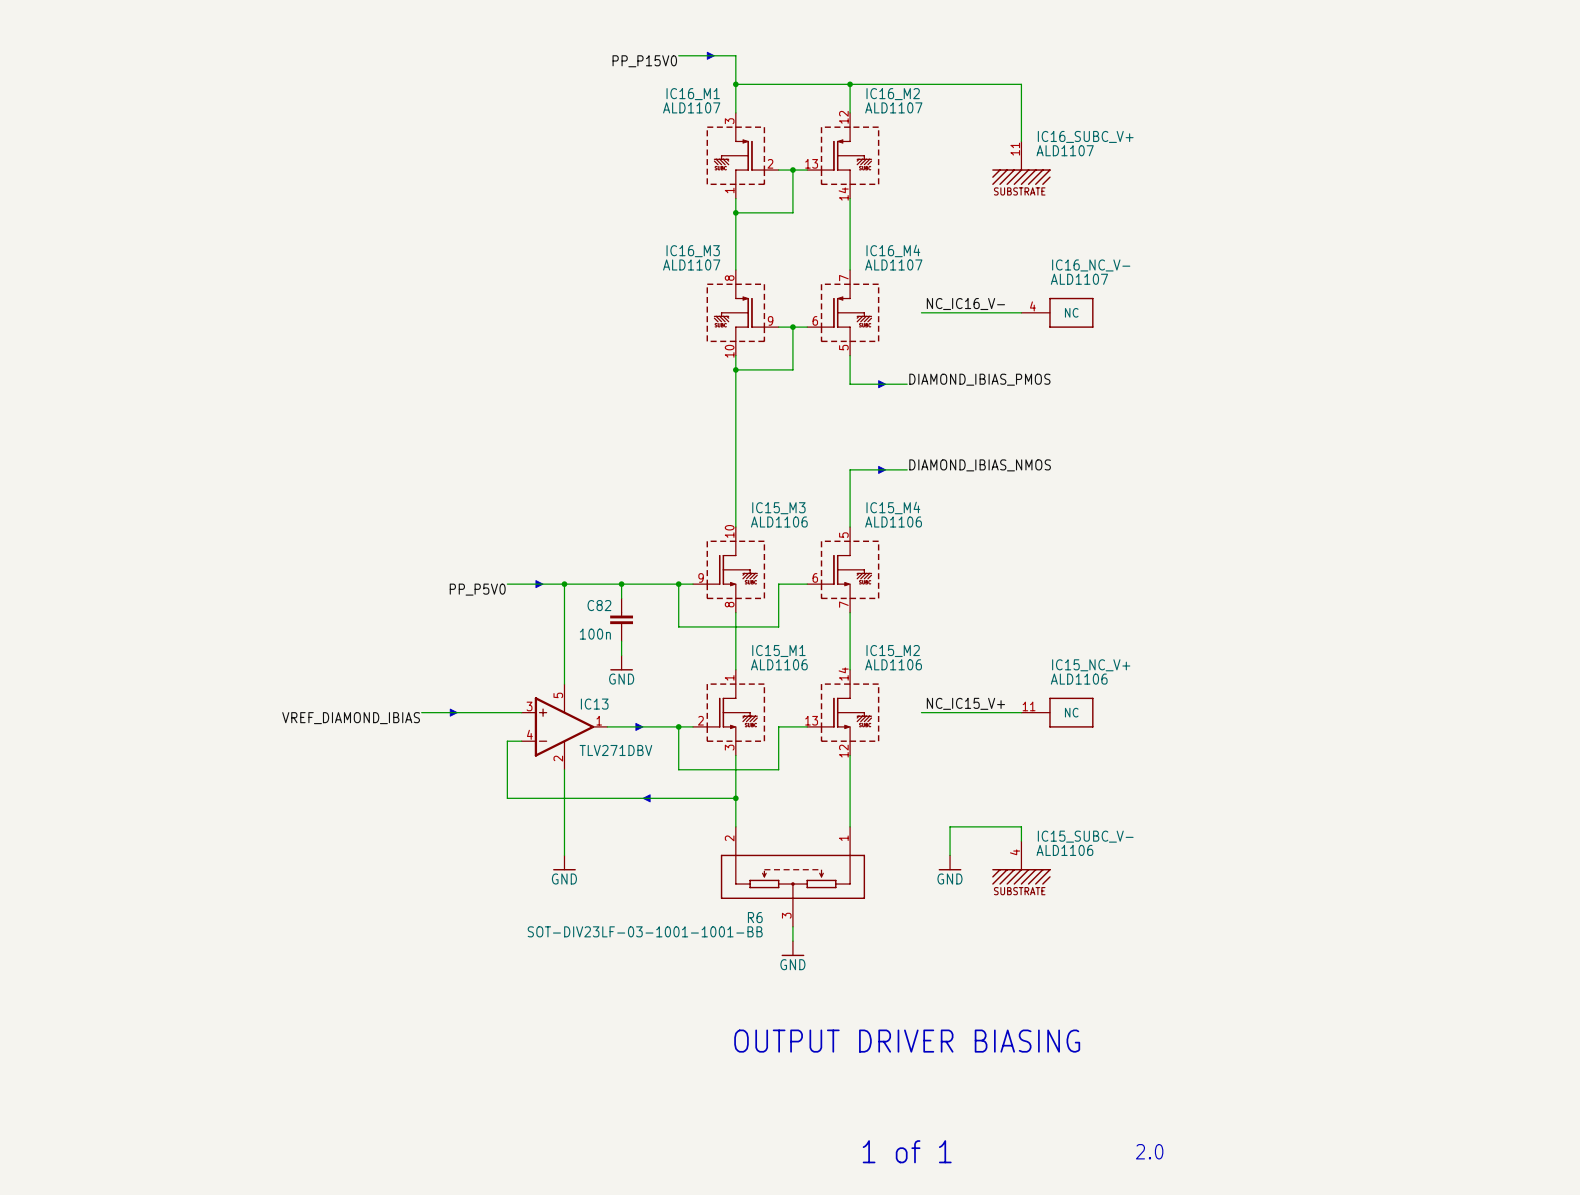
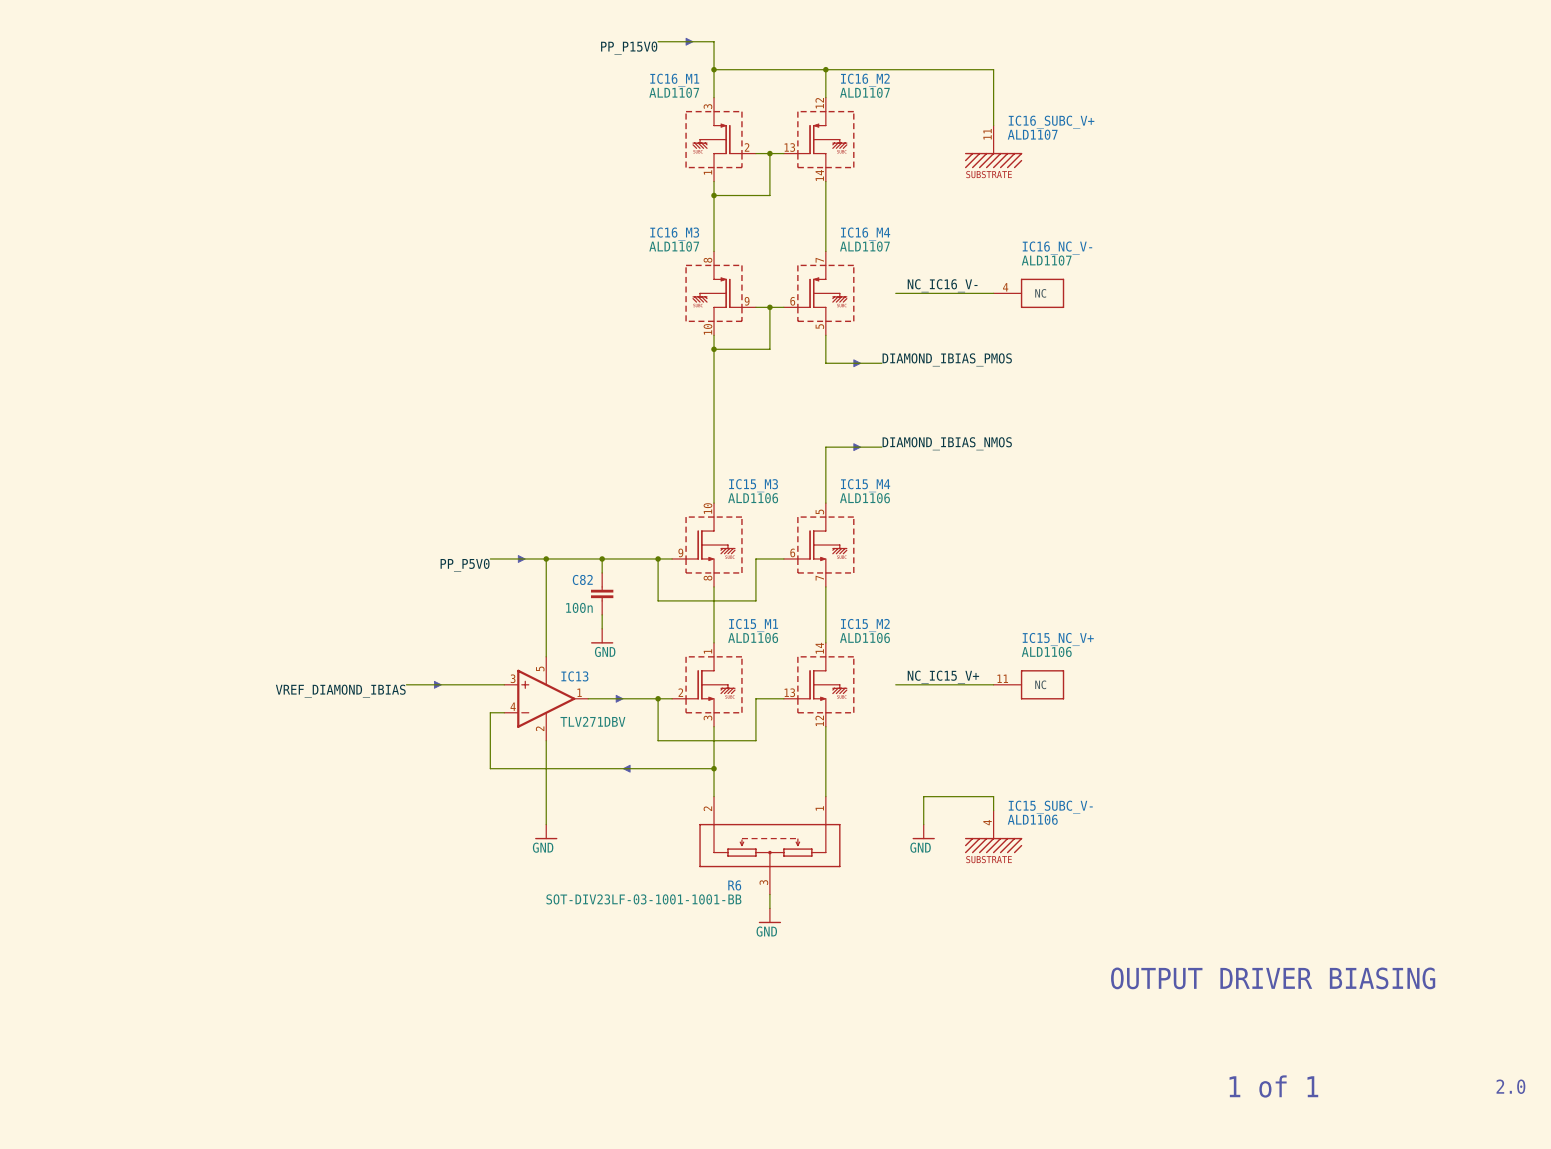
text: none -> OUTPUT DRIVER BIASING (1273, 978)
text: OUTPUT DRIVER BIASING (907, 1041) -> none
text: none -> 1 of 1 (1273, 1086)
text: none -> 2.0 (1510, 1086)
text: 1 of 1 (907, 1151) -> none
text: 2.0 (1149, 1151) -> none

